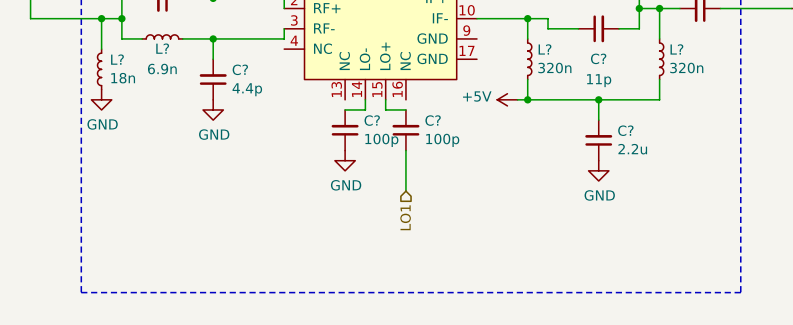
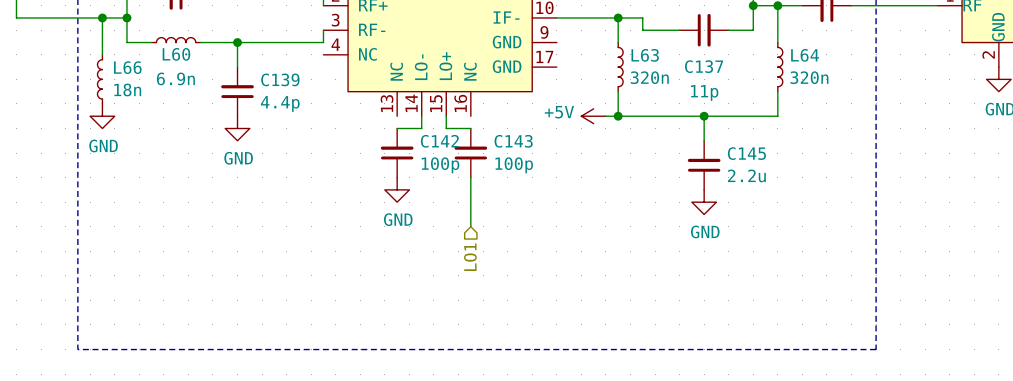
L? name: L? (162, 48) -> L60 (176, 54)
L? name: L? (545, 49) -> L63 (645, 55)
L? name: L? (676, 49) -> L64 (805, 55)
C? name: C? (598, 58) -> C137 (704, 66)
L? name: L? (117, 59) -> L66 (127, 67)
C? name: C? (240, 69) -> C139 (280, 79)
C? name: C? (372, 120) -> C142 (439, 141)
C? name: C? (433, 120) -> C143 (513, 141)
C? name: C? (625, 130) -> C145 (746, 153)

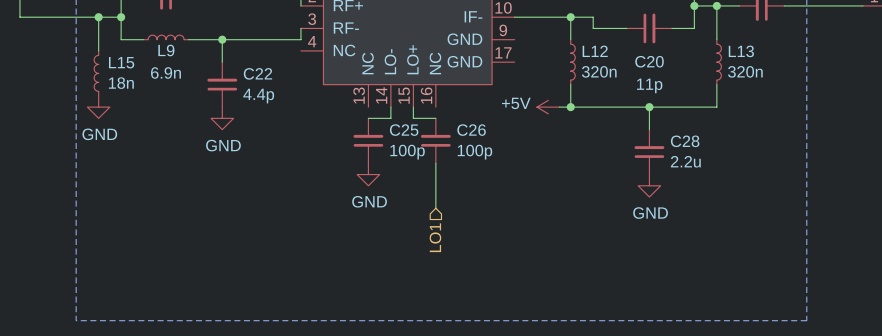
L60 name: L60 (176, 54) -> L9 (166, 50)
L63 name: L63 (645, 55) -> L12 (595, 51)
L64 name: L64 (805, 55) -> L13 (741, 51)
C137 name: C137 (704, 66) -> C20 (649, 61)
L66 name: L66 (127, 67) -> L15 (121, 62)
C139 name: C139 (280, 79) -> C22 (257, 73)
C142 name: C142 (439, 141) -> C25 (404, 130)
C143 name: C143 (513, 141) -> C26 (471, 130)
C145 name: C145 (746, 153) -> C28 (685, 141)

